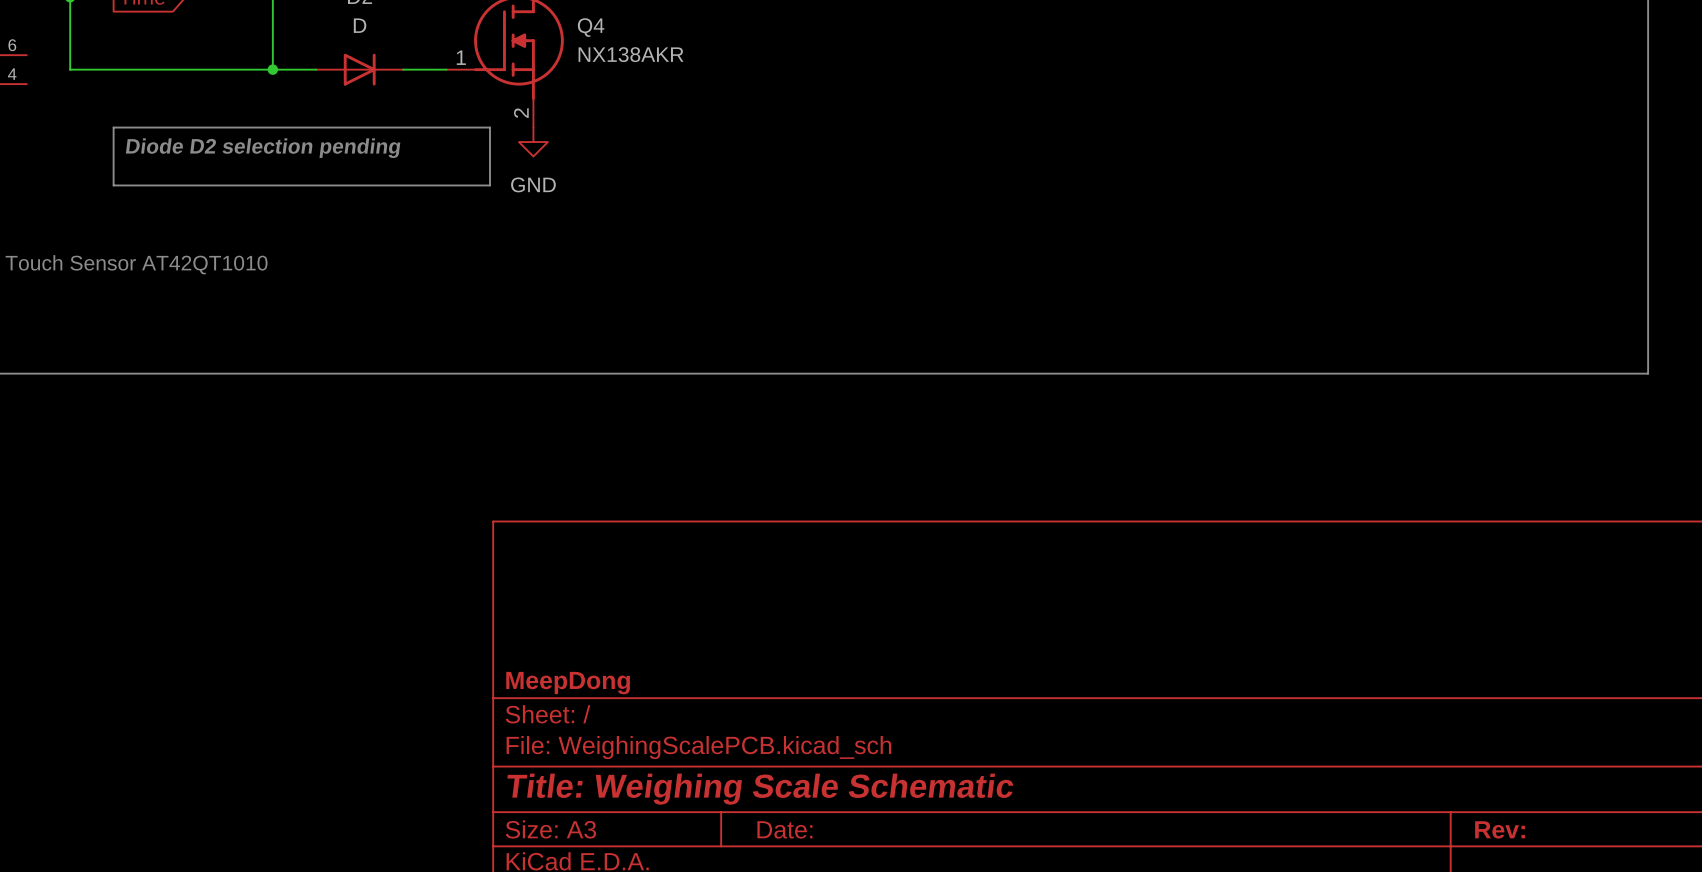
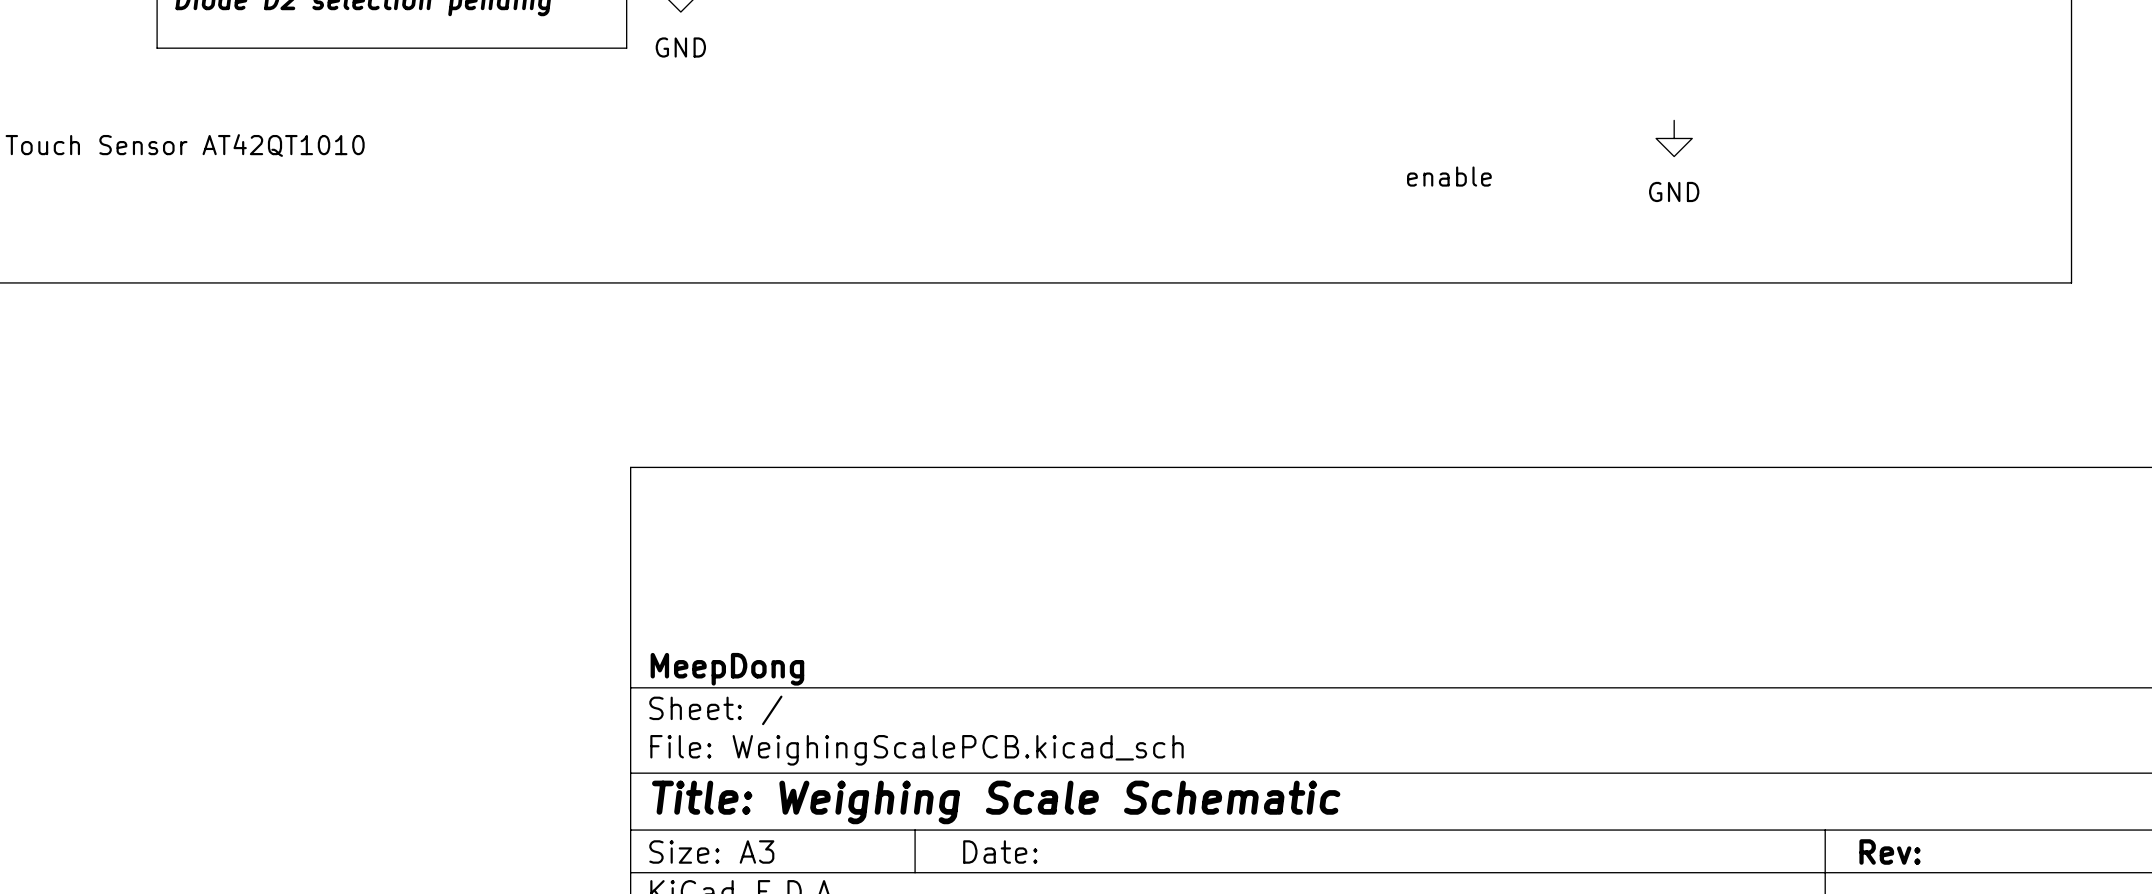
power symbol: none -> GND (1674, 138)
label: none -> enable (1449, 176)

